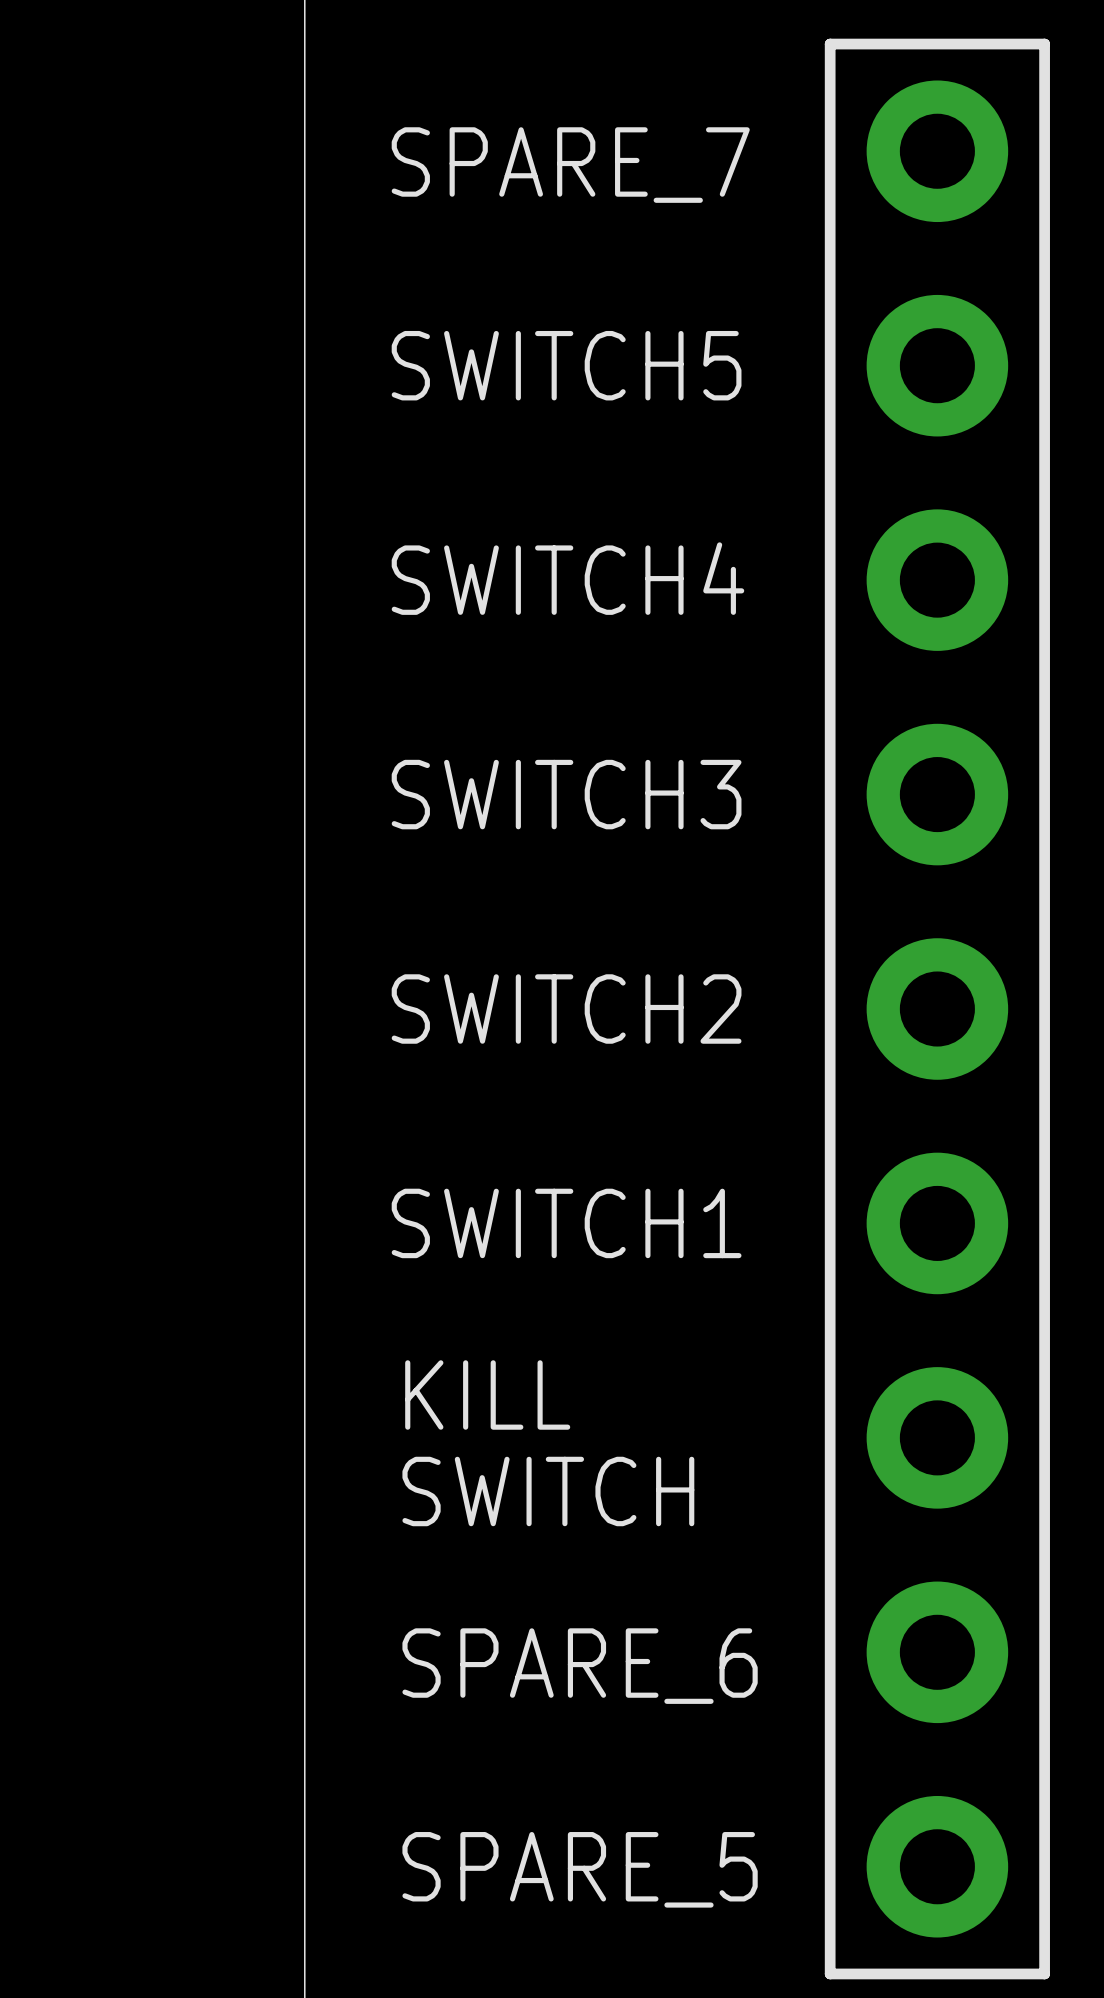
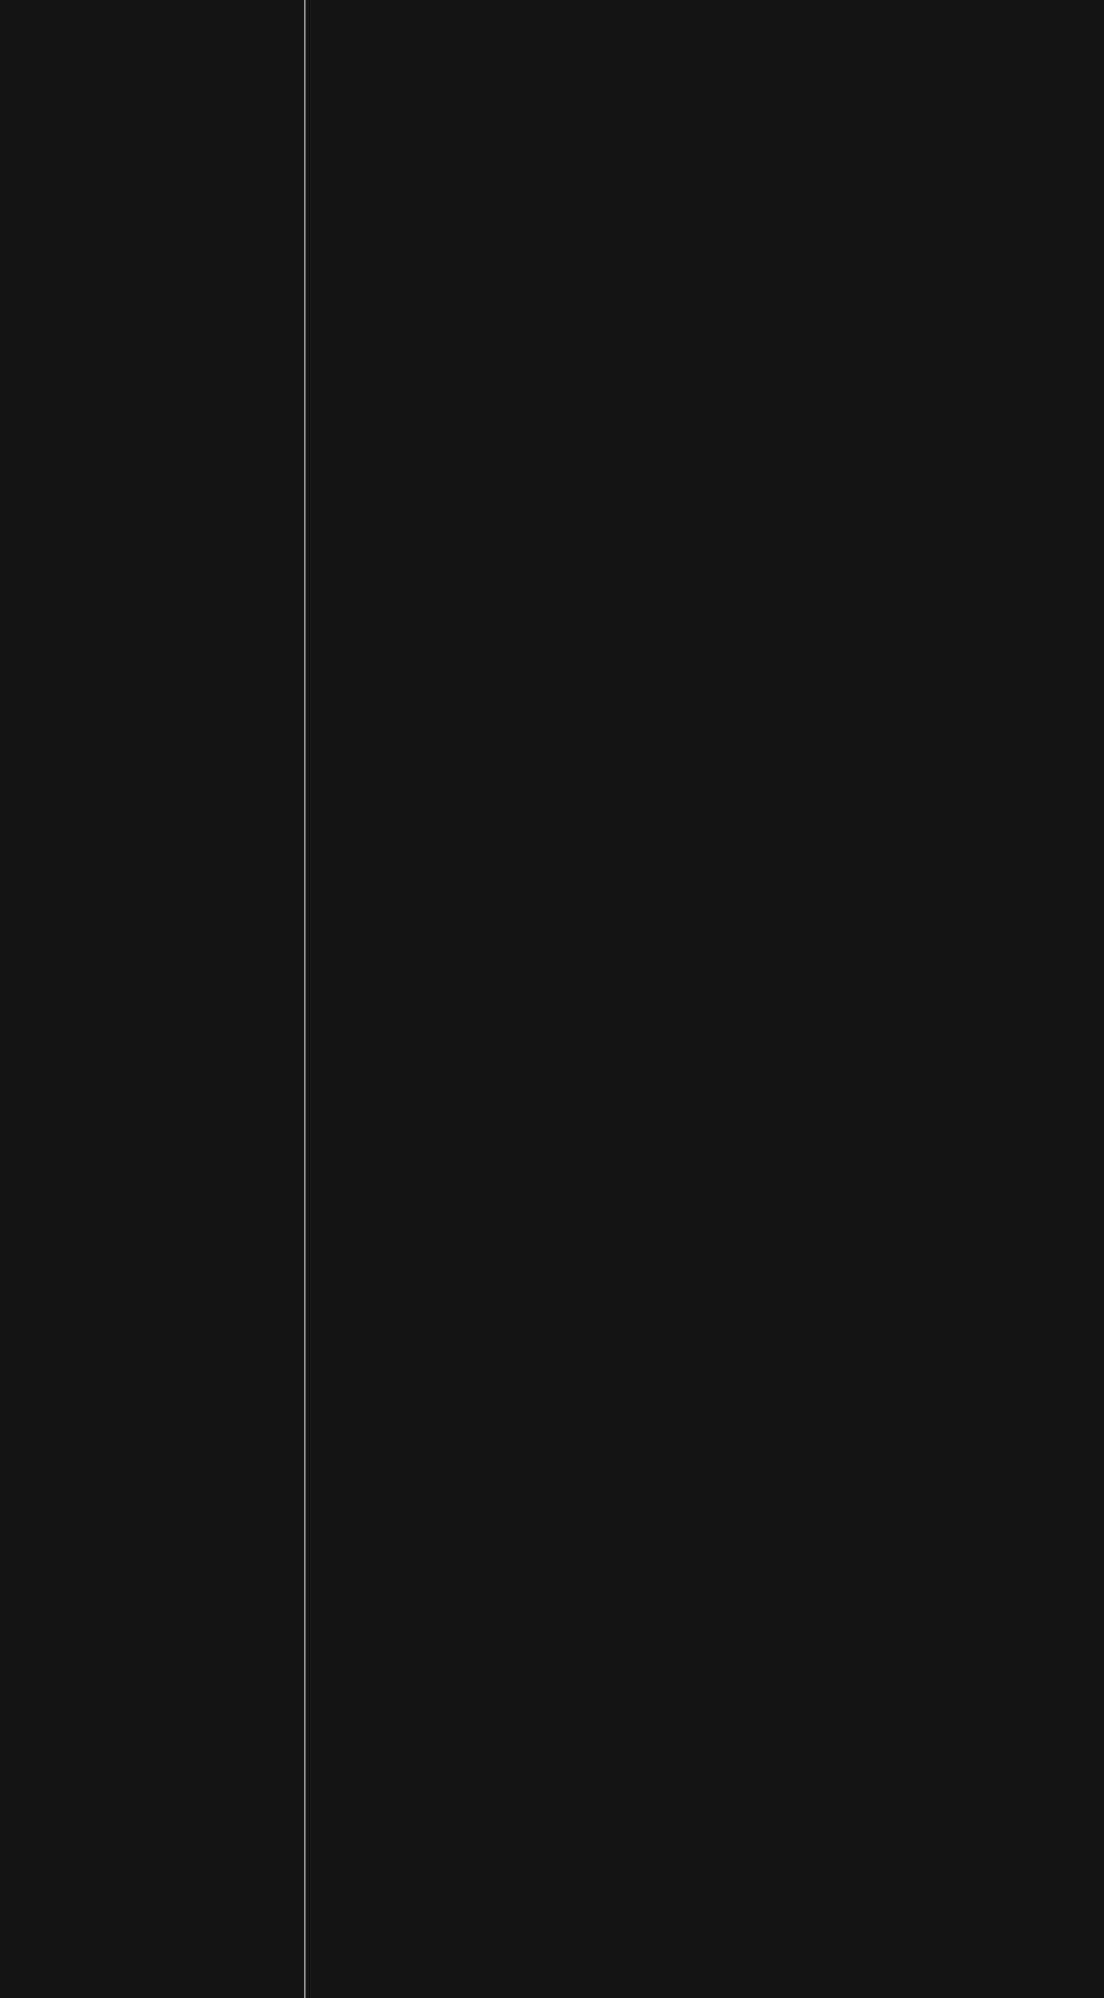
text: SPARE_7 (570, 165) -> none
text: SWITCH5 (566, 365) -> none
text: SWITCH4 (567, 578) -> none
text: SWITCH3 (566, 794) -> none
text: SWITCH2 (566, 1009) -> none
part: (937, 1009) -> none
text: SWITCH1 (566, 1223) -> none
text: KILL (487, 1394) -> none
text: SWITCH (548, 1491) -> none
text: SPARE_6 (580, 1666) -> none
text: SPARE_5 (580, 1869) -> none

